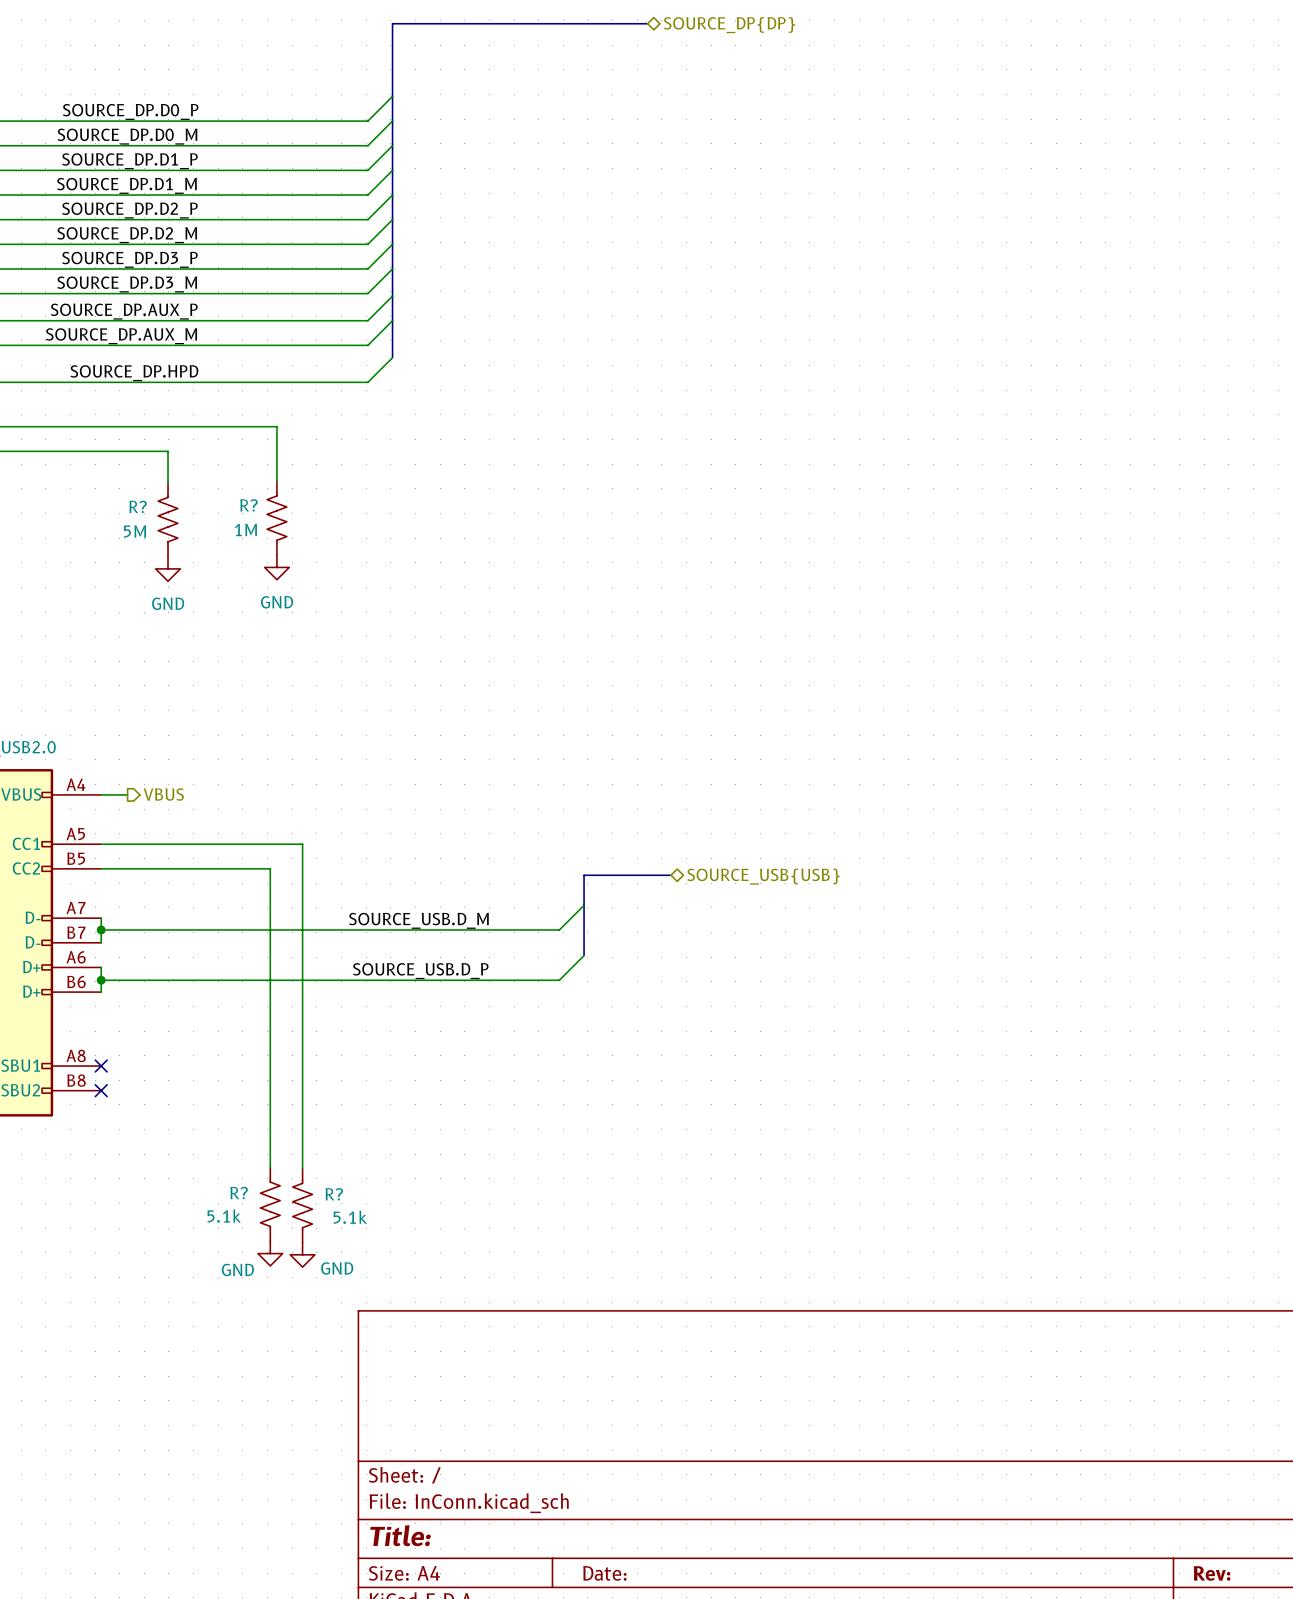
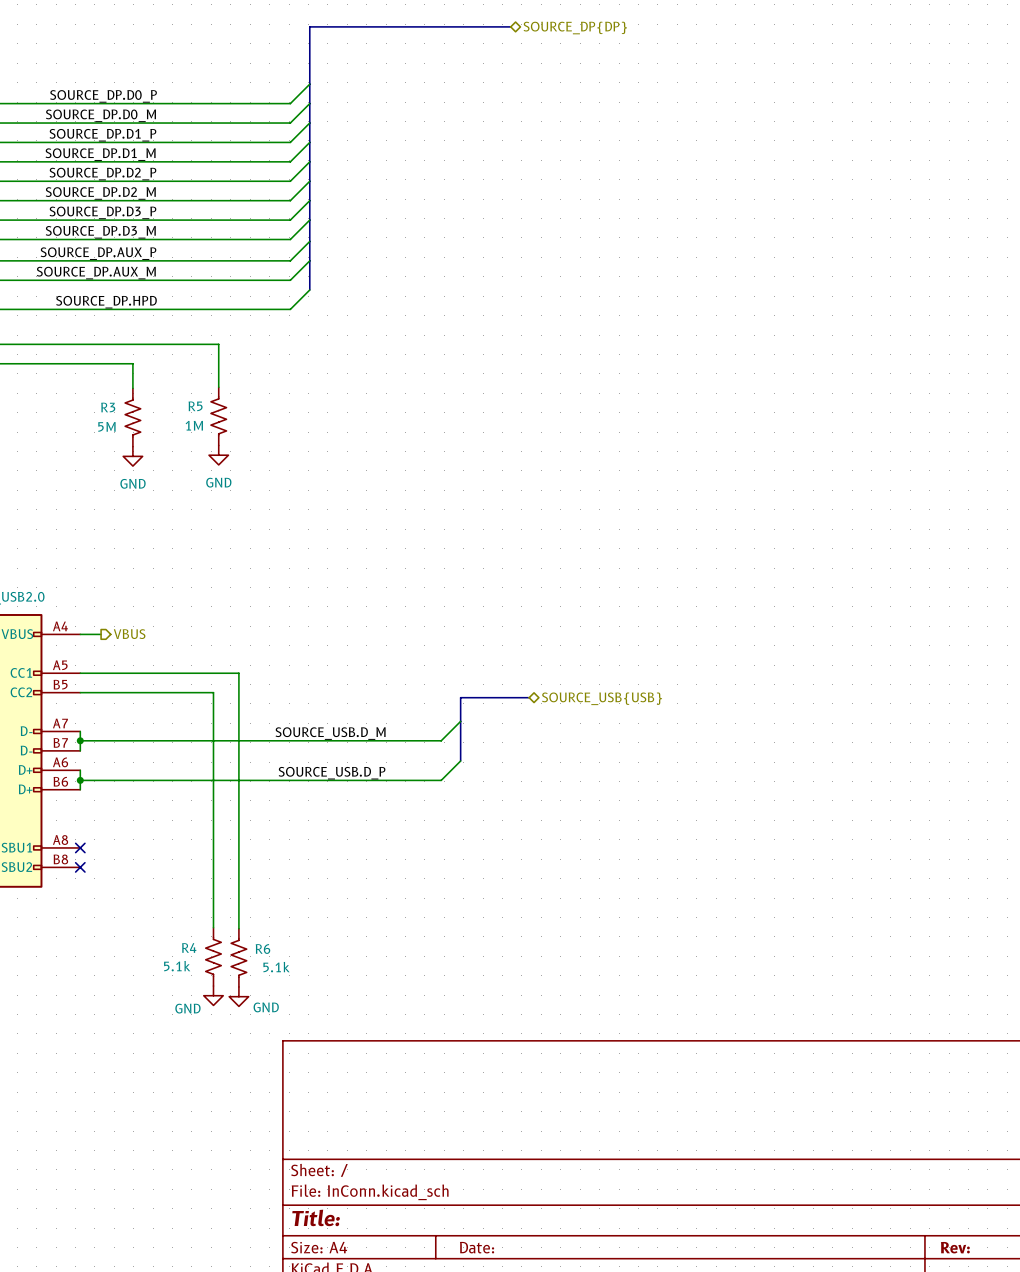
R? name: R? (248, 505) -> R5 (195, 406)
R? name: R? (138, 506) -> R3 (108, 407)
R? name: R? (239, 1193) -> R4 (189, 947)
R? name: R? (334, 1194) -> R6 (262, 949)

